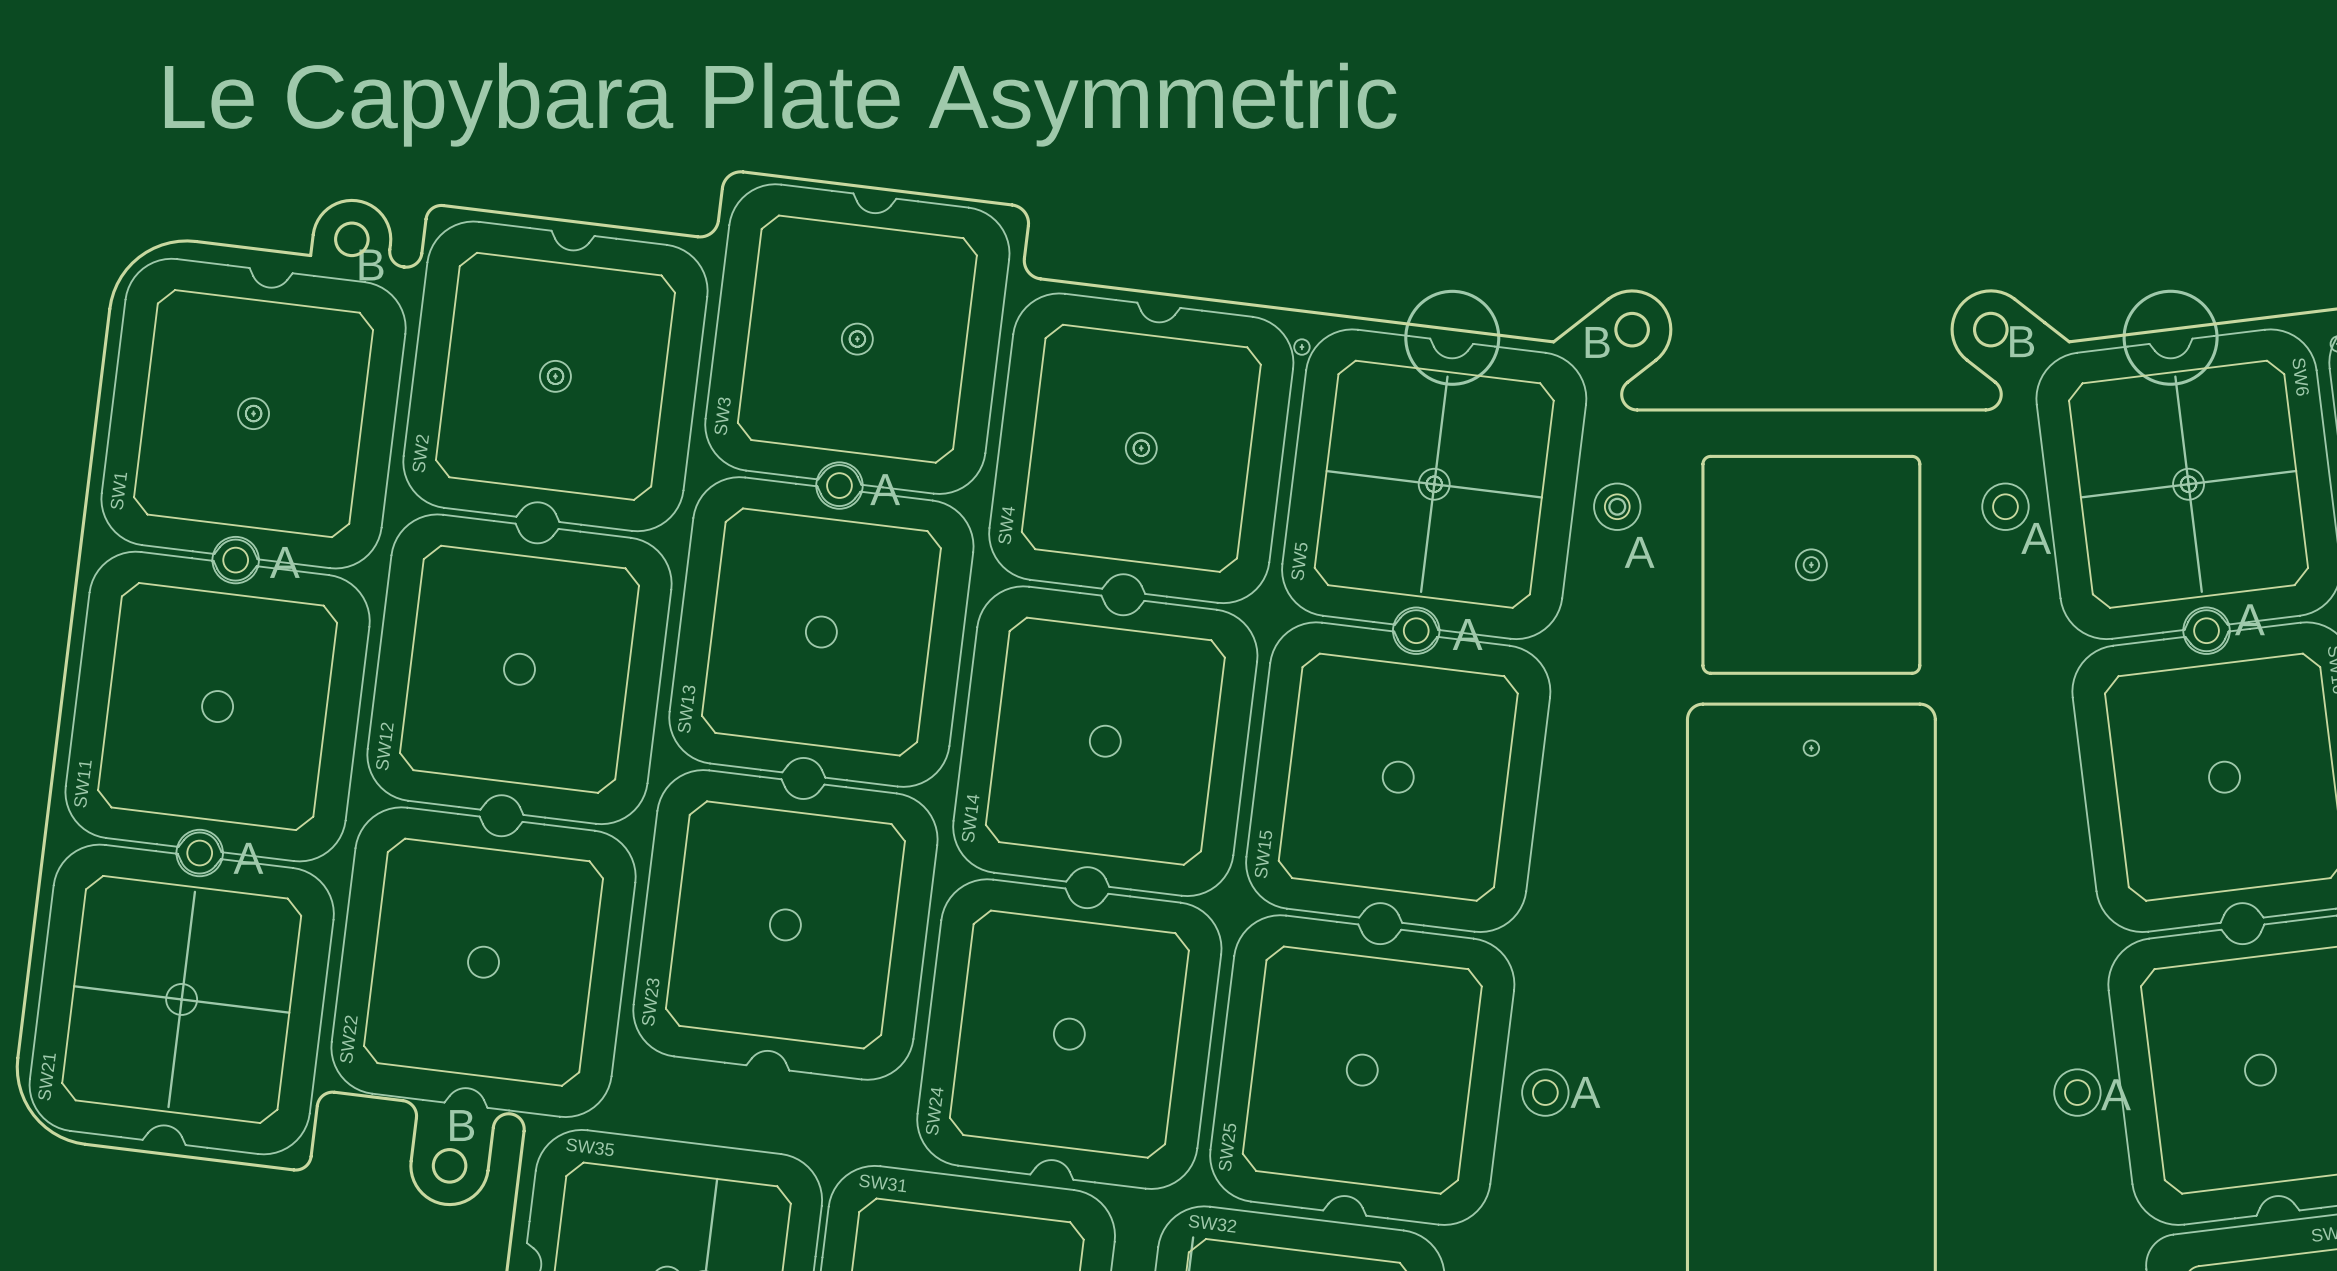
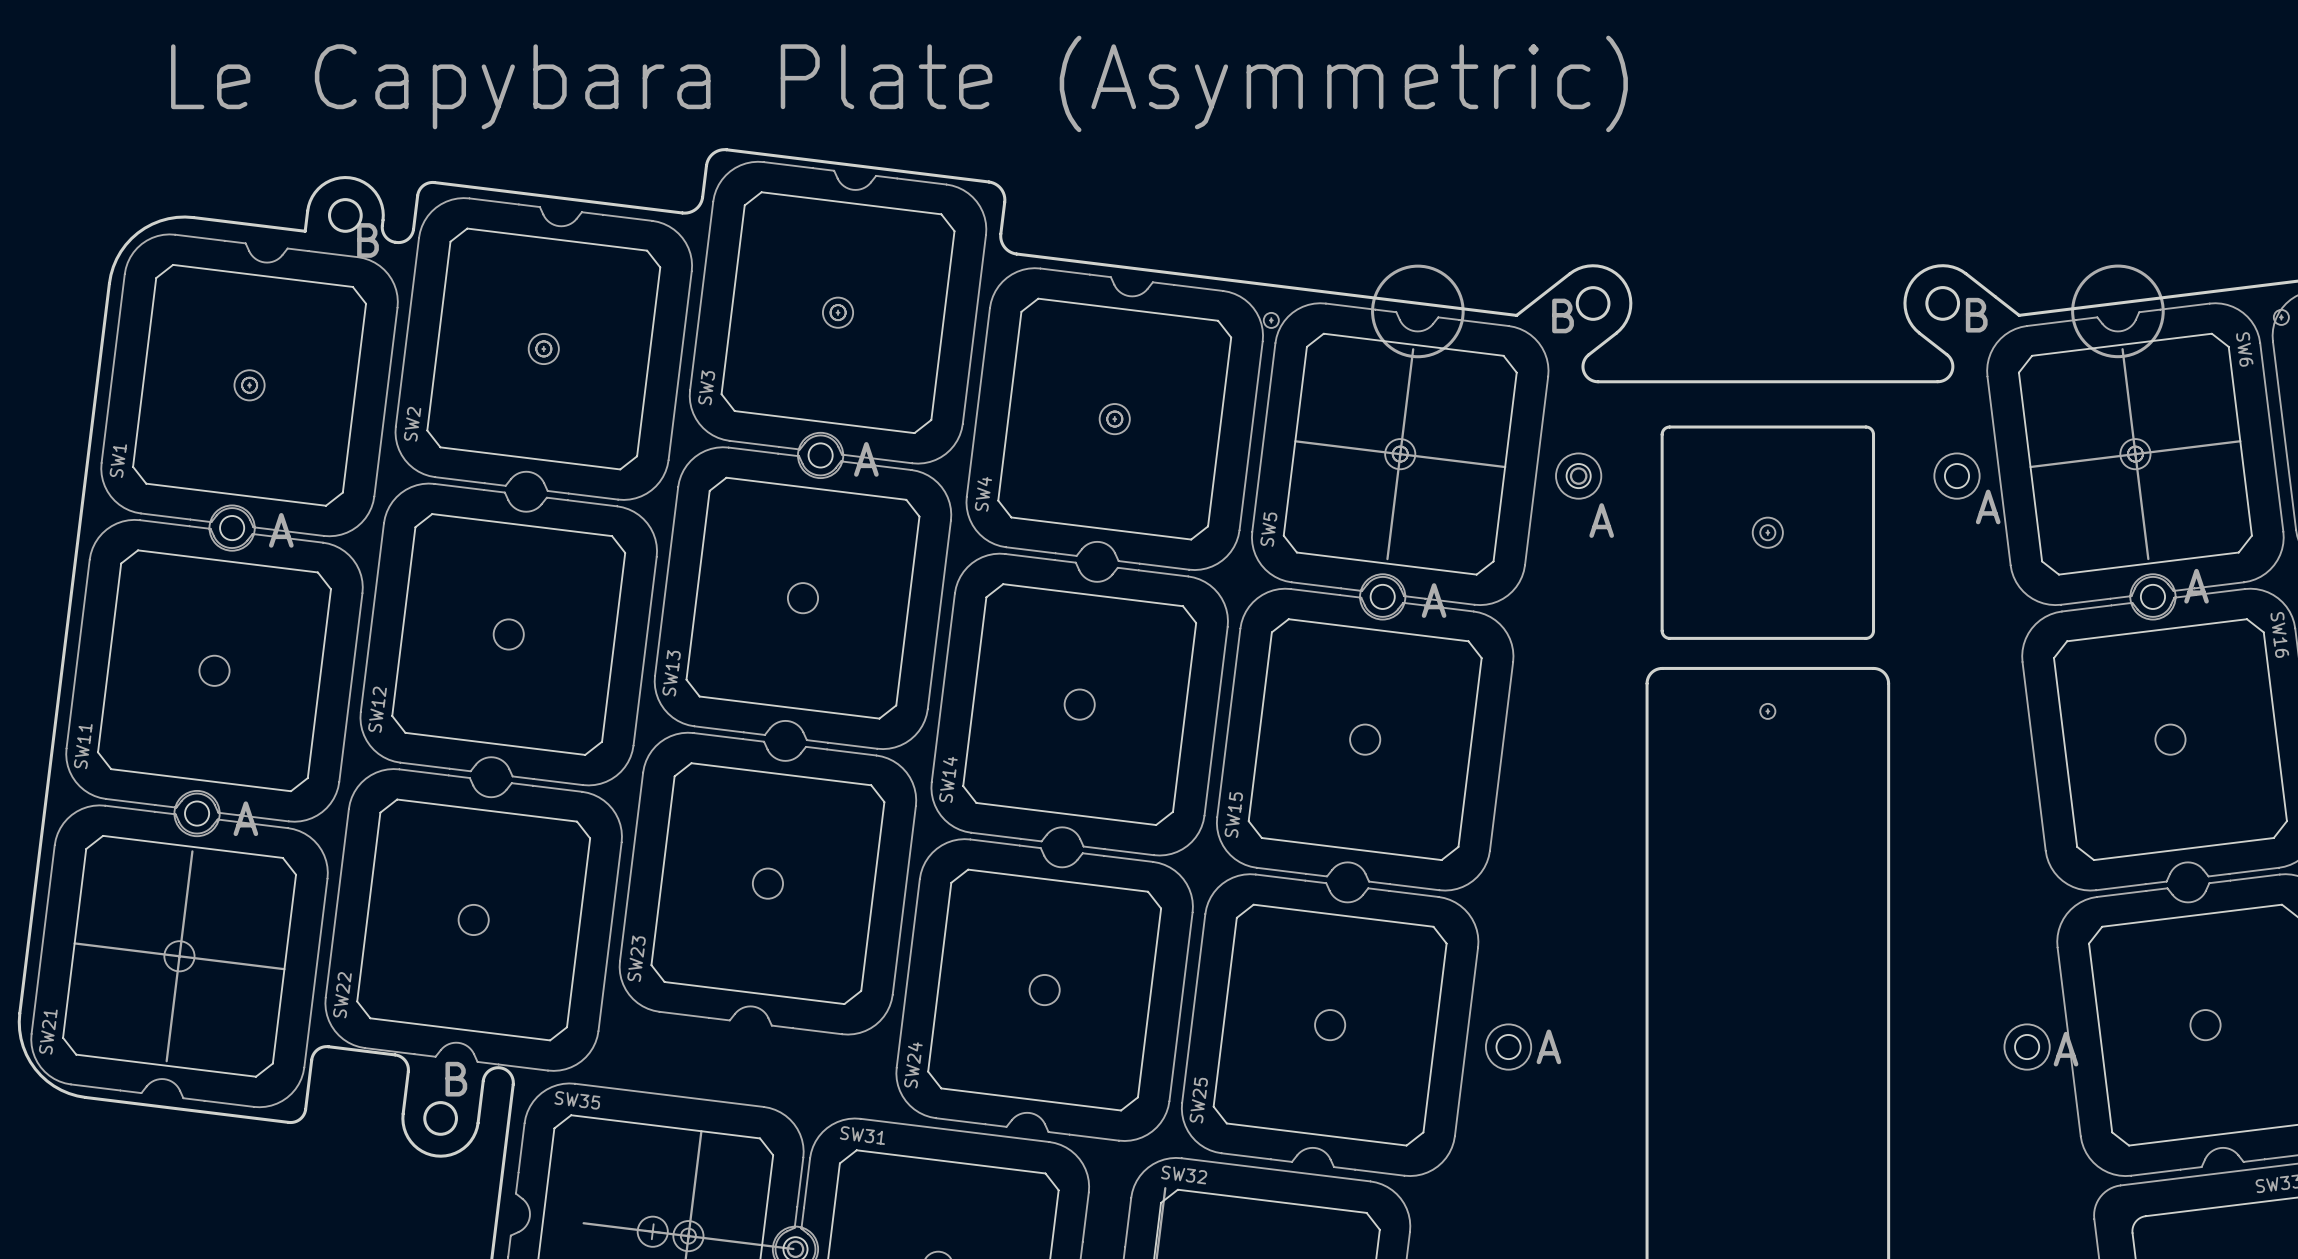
text: Le Capybara Plate Asymmetric (780, 104) -> Le Capybara Plate (Asymmetric) (899, 83)

